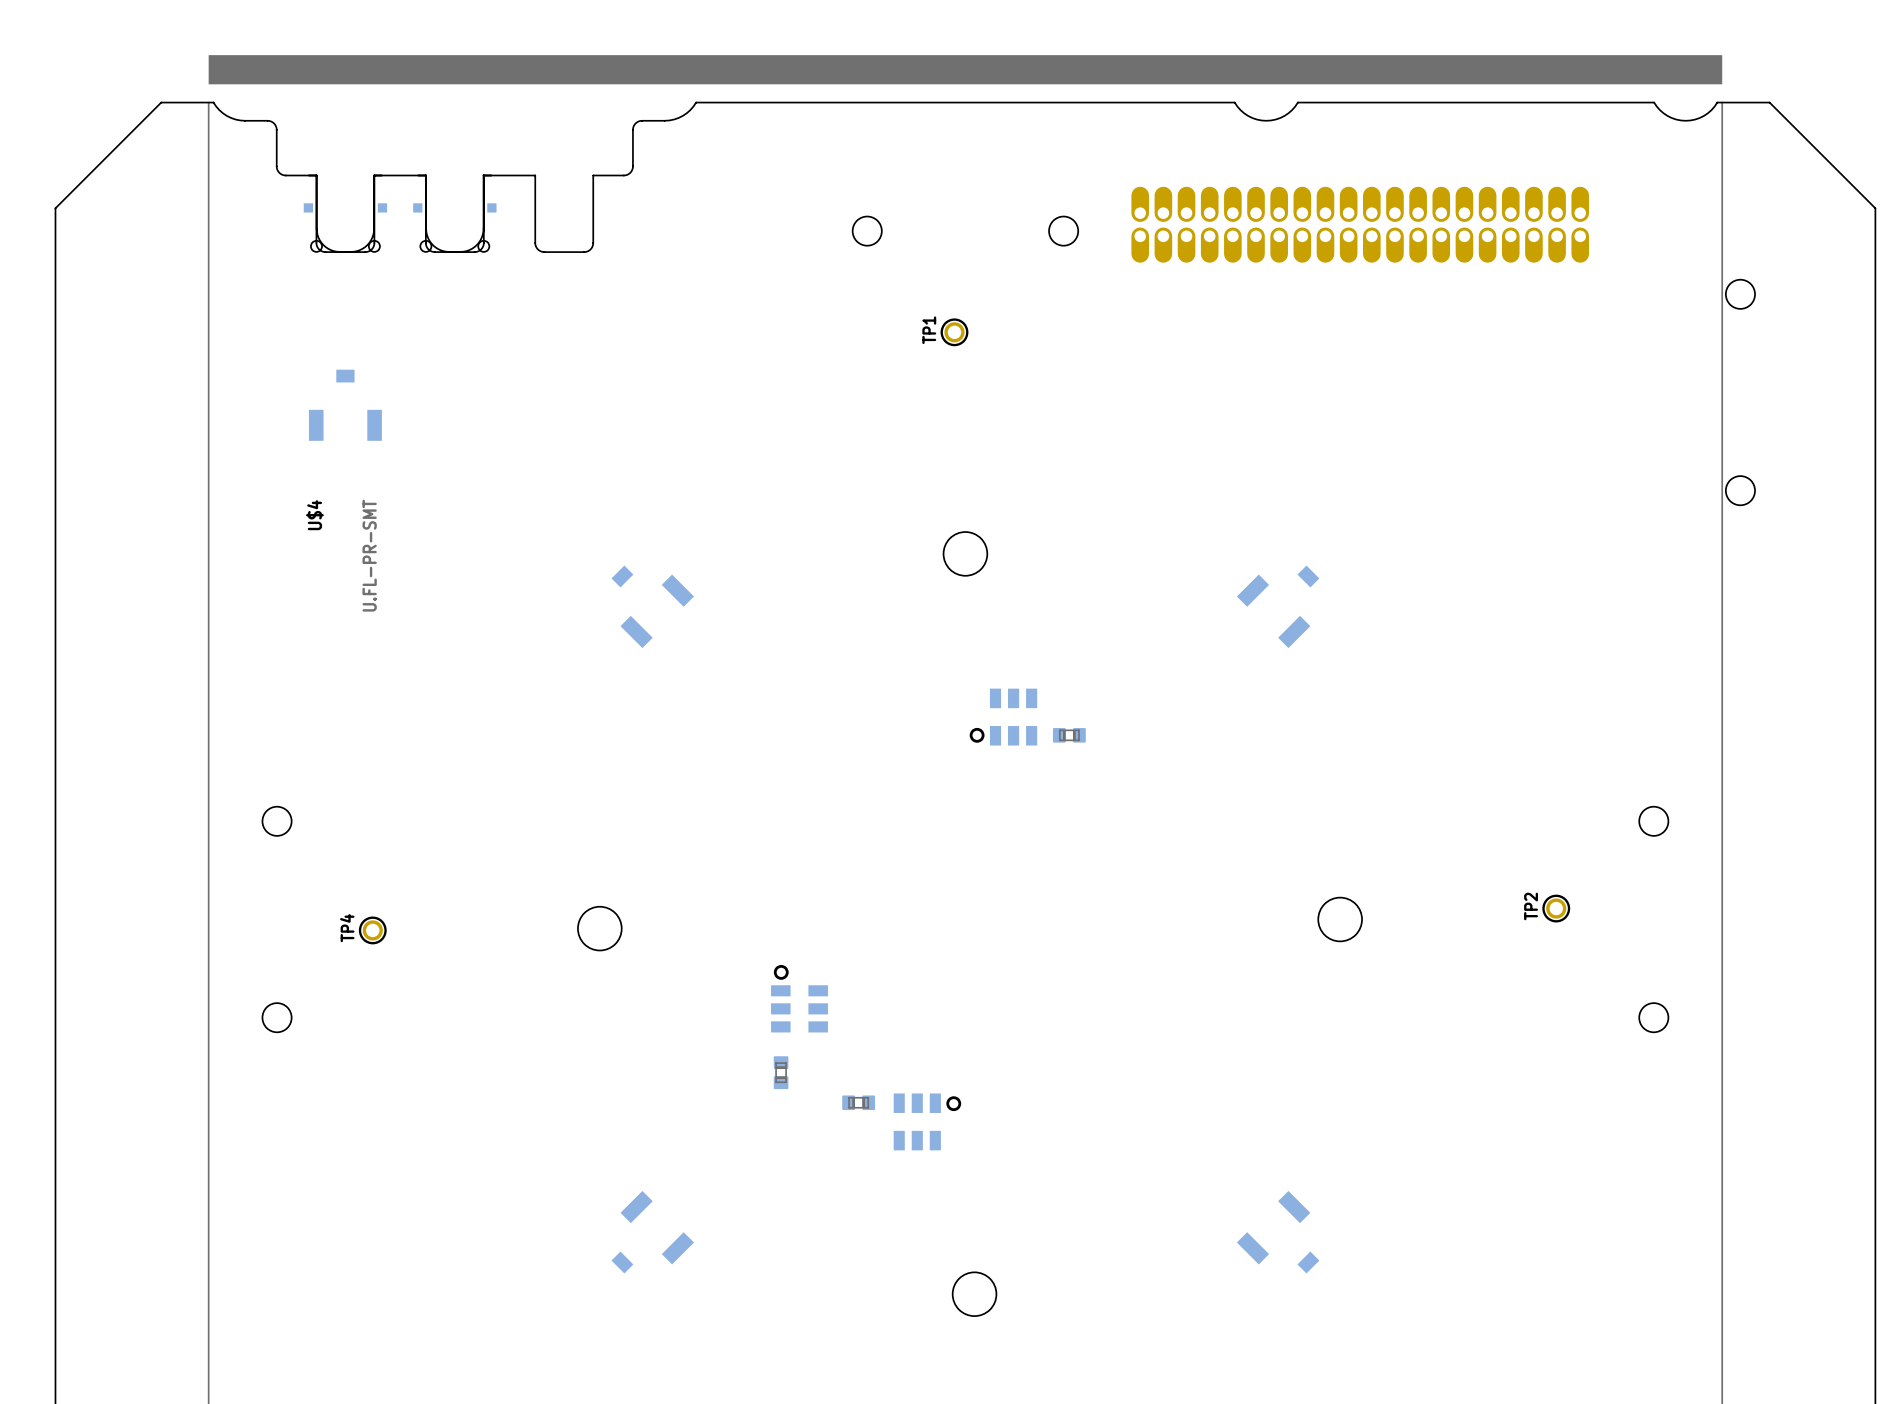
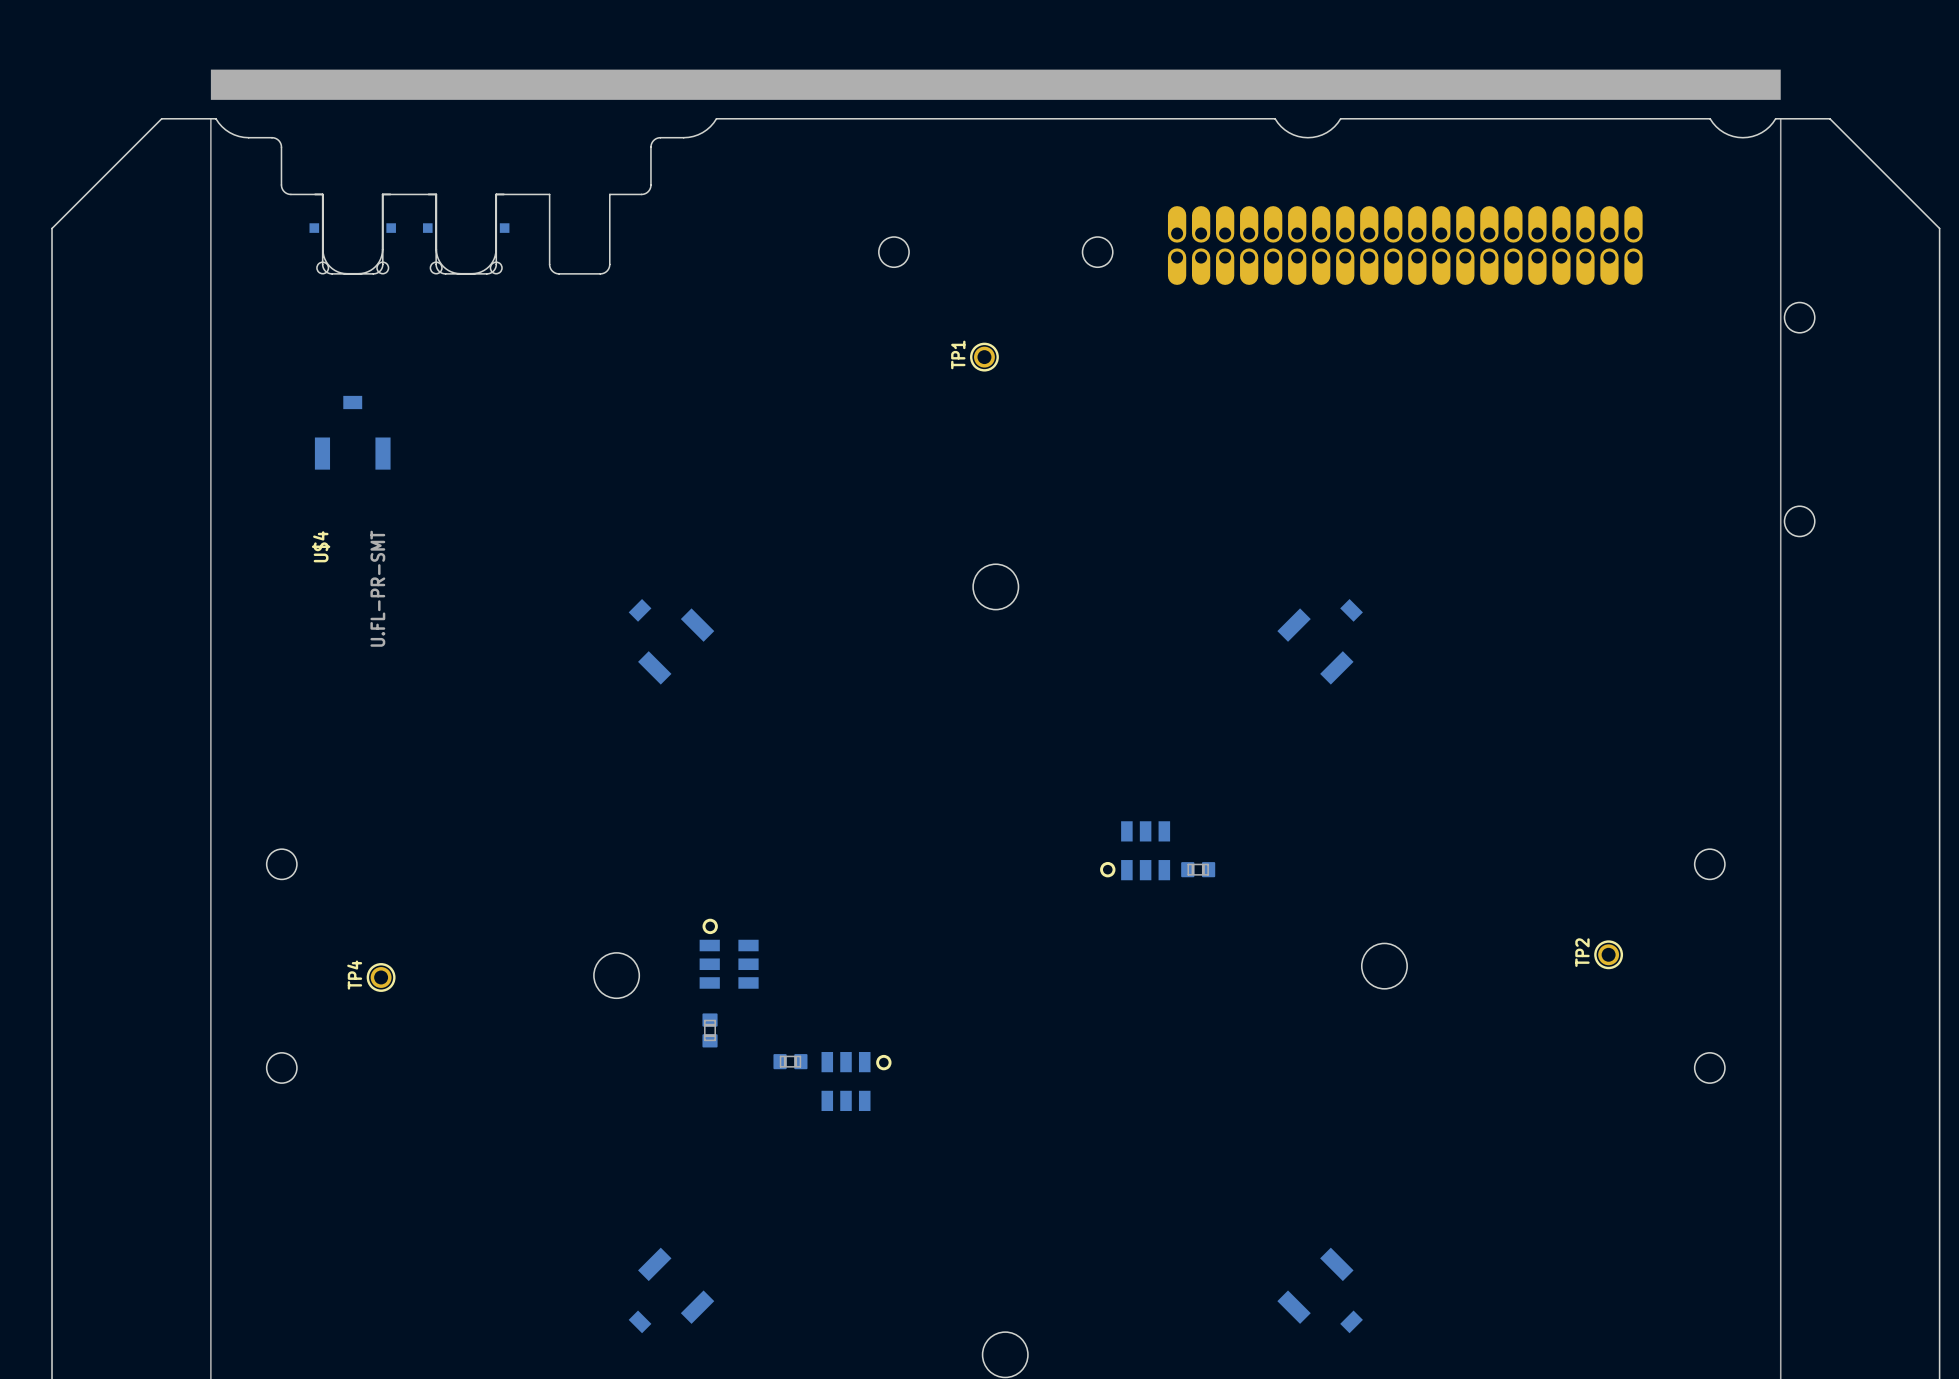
part position: (1003, 717) -> (1135, 850)
part position: (1069, 735) -> (1198, 869)
part: none -> (729, 953)
part: none -> (710, 1030)
part rotation: 0° (799, 998) -> 90° clockwise (856, 1081)
part position: (799, 998) -> (856, 1081)
part rotation: 0° (781, 1072) -> 90° clockwise (790, 1061)
part position: (781, 1072) -> (790, 1061)
part: (858, 1102) -> none
part: (927, 1121) -> none

